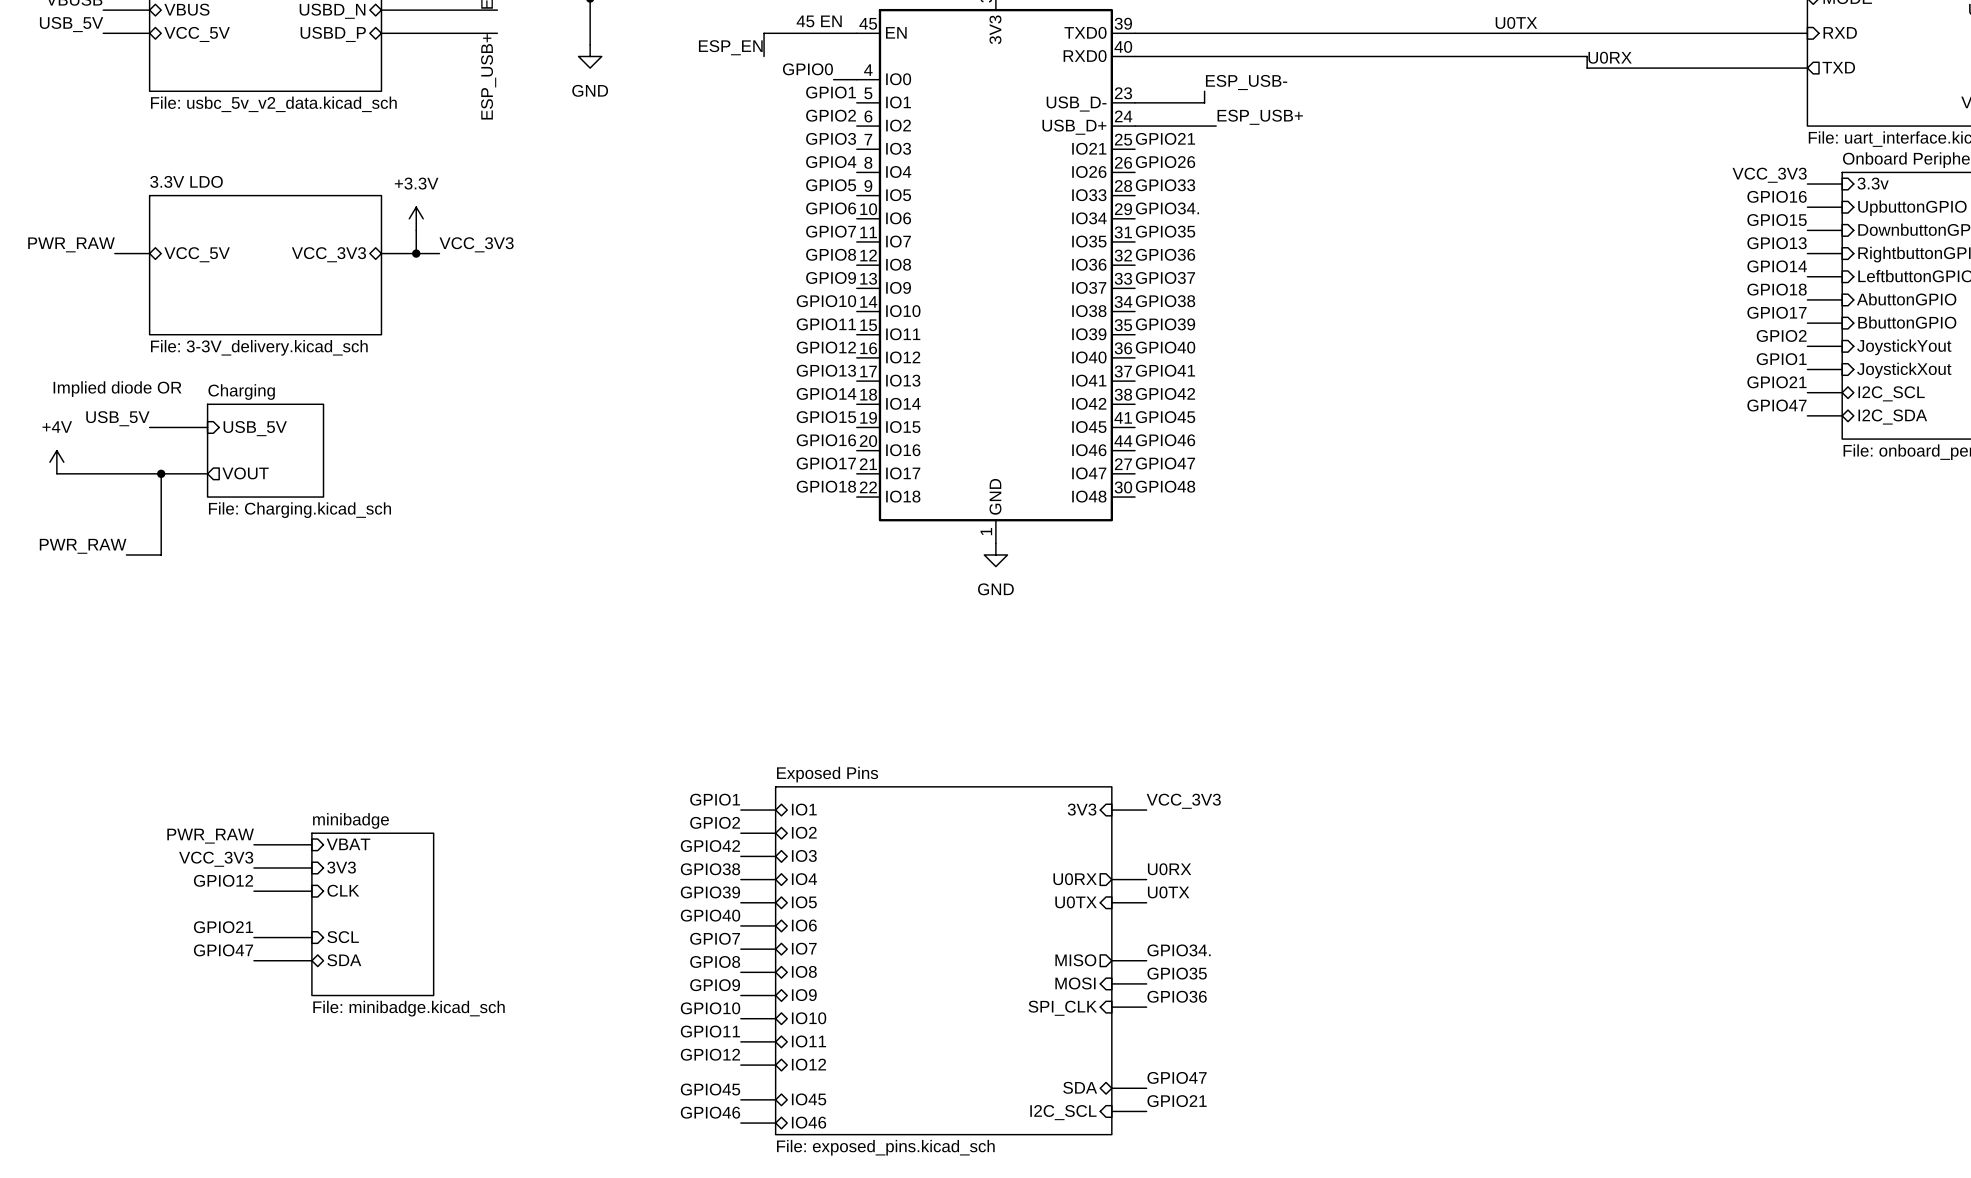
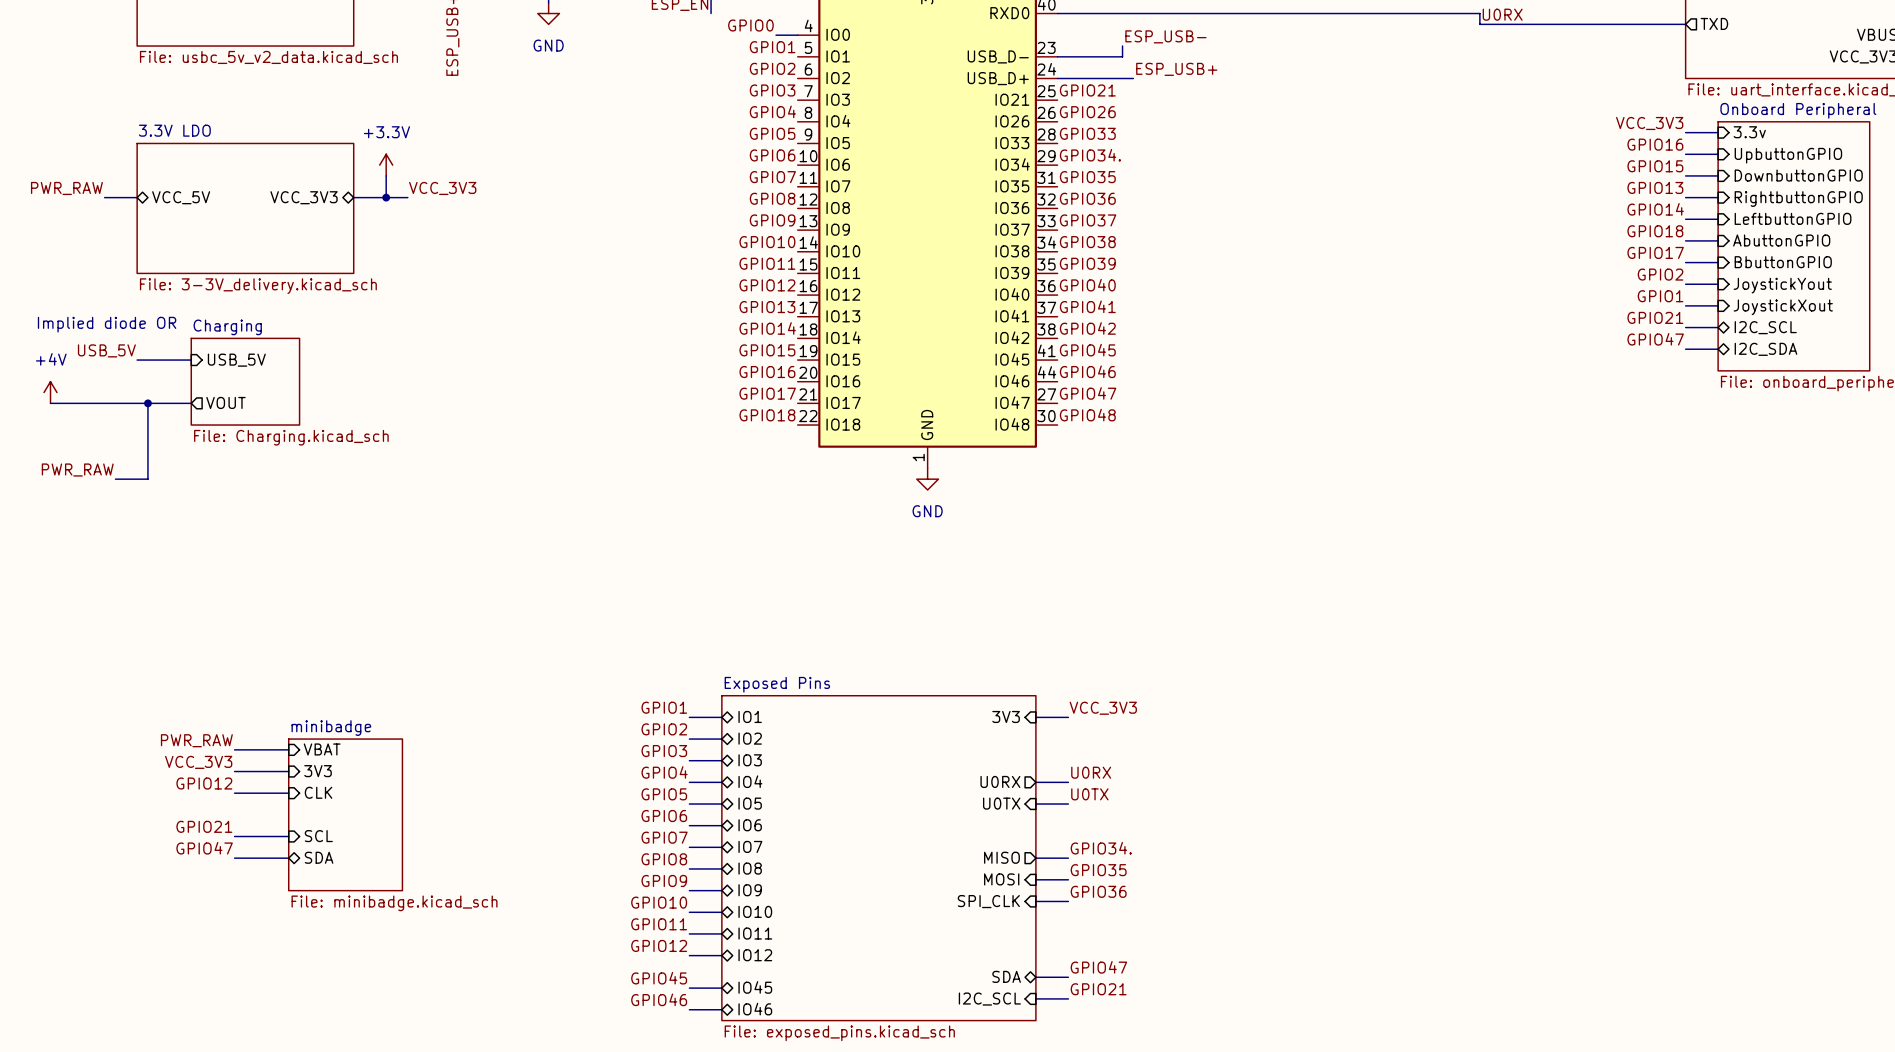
label: GPIO42 (710, 846) -> GPIO3 (664, 751)
label: GPIO38 (710, 869) -> GPIO4 (664, 772)
label: GPIO39 (710, 892) -> GPIO5 (664, 794)
label: GPIO40 (710, 915) -> GPIO6 (664, 816)

